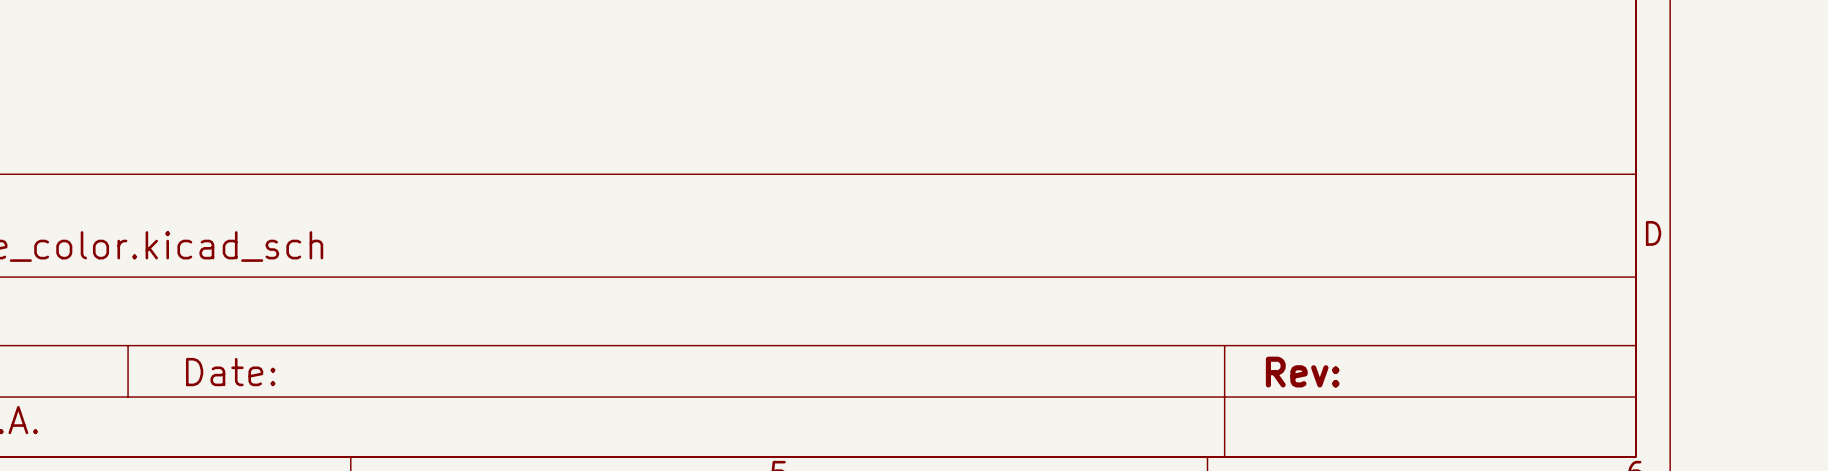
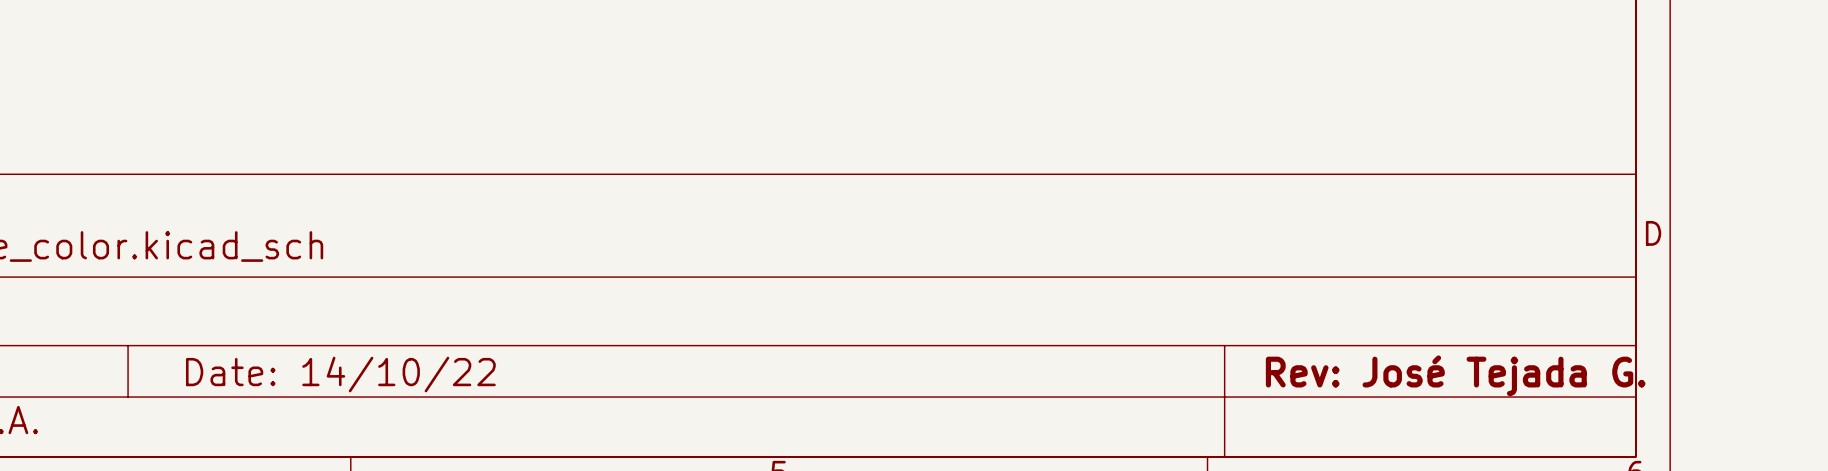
title block: Date: (230, 372) -> Date: 14/10/22 (340, 374)
title block: Rev: (1302, 372) -> Rev: José Tejada G. (1455, 375)

